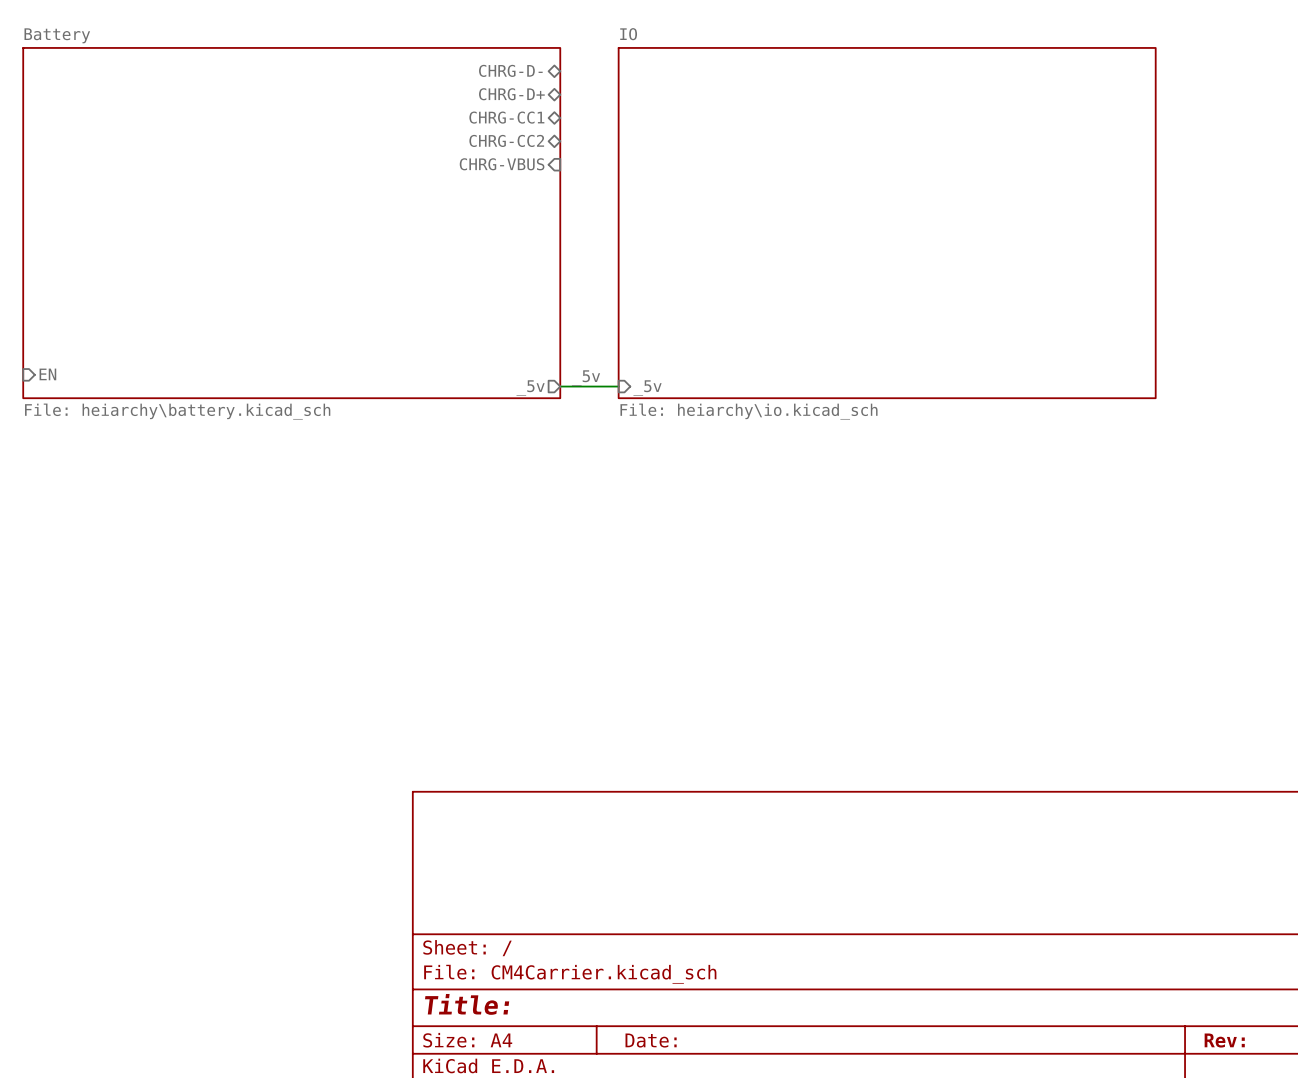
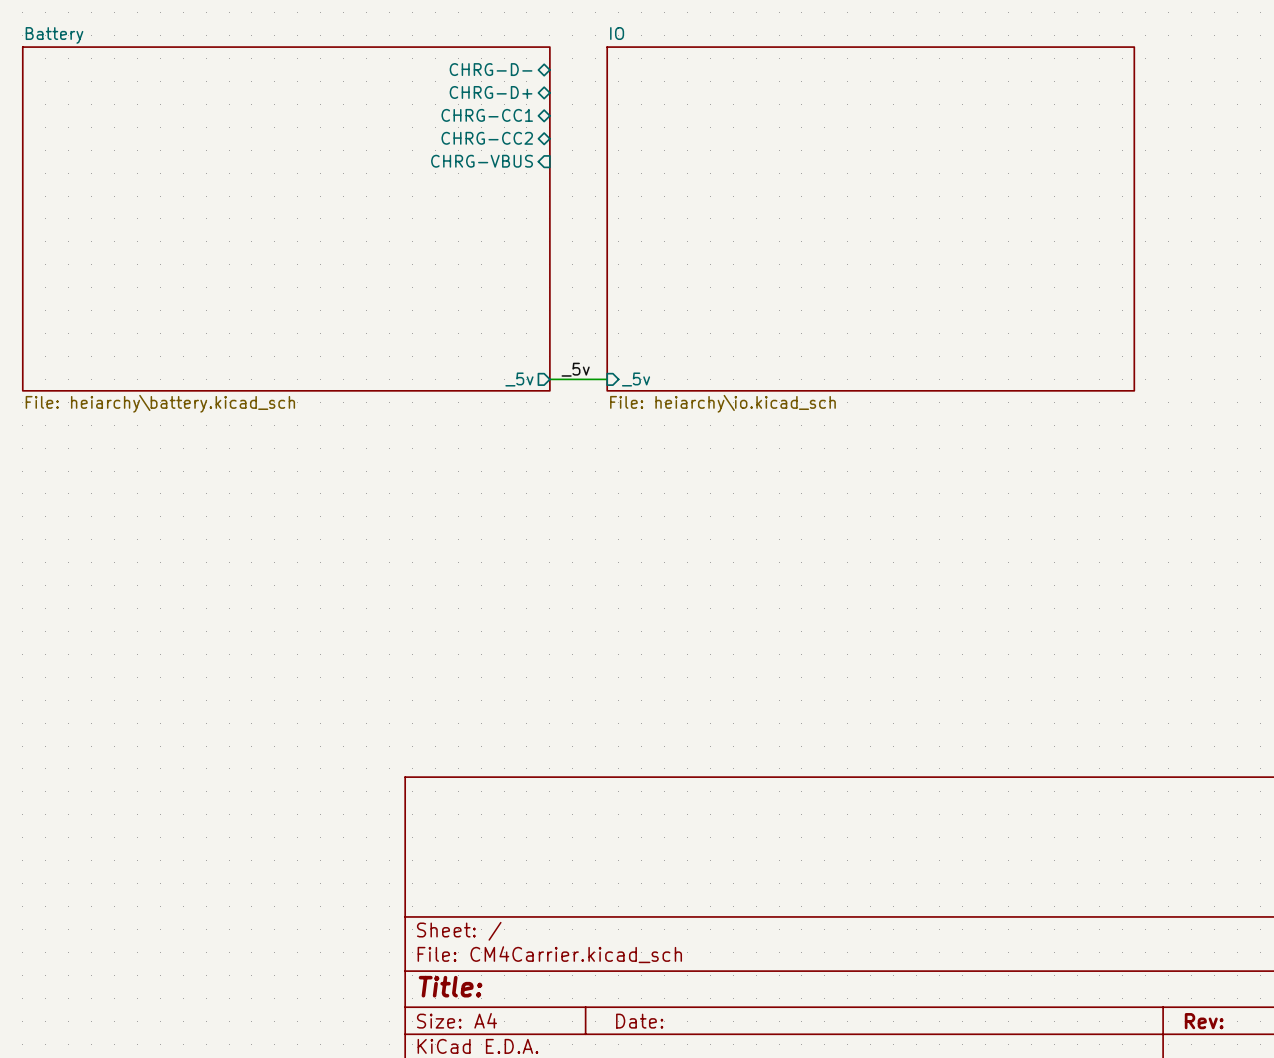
sheet pin: EN (47, 374) -> none

